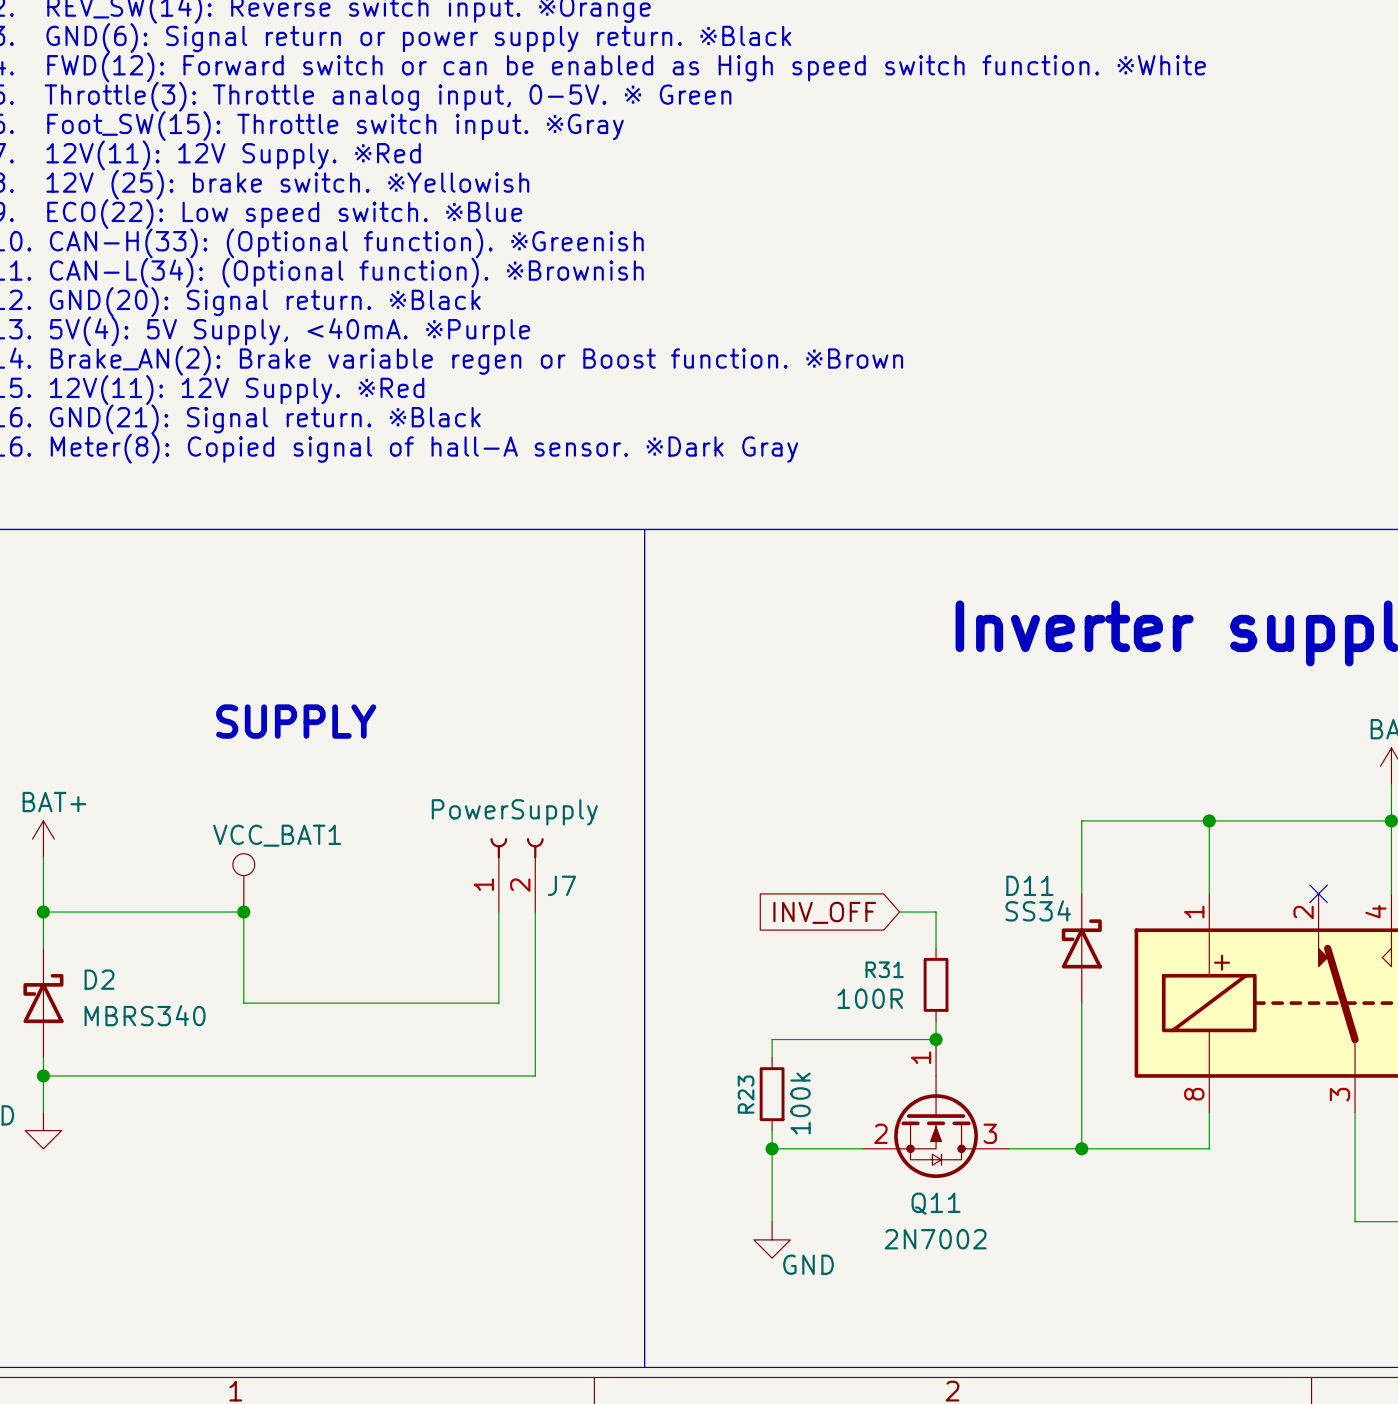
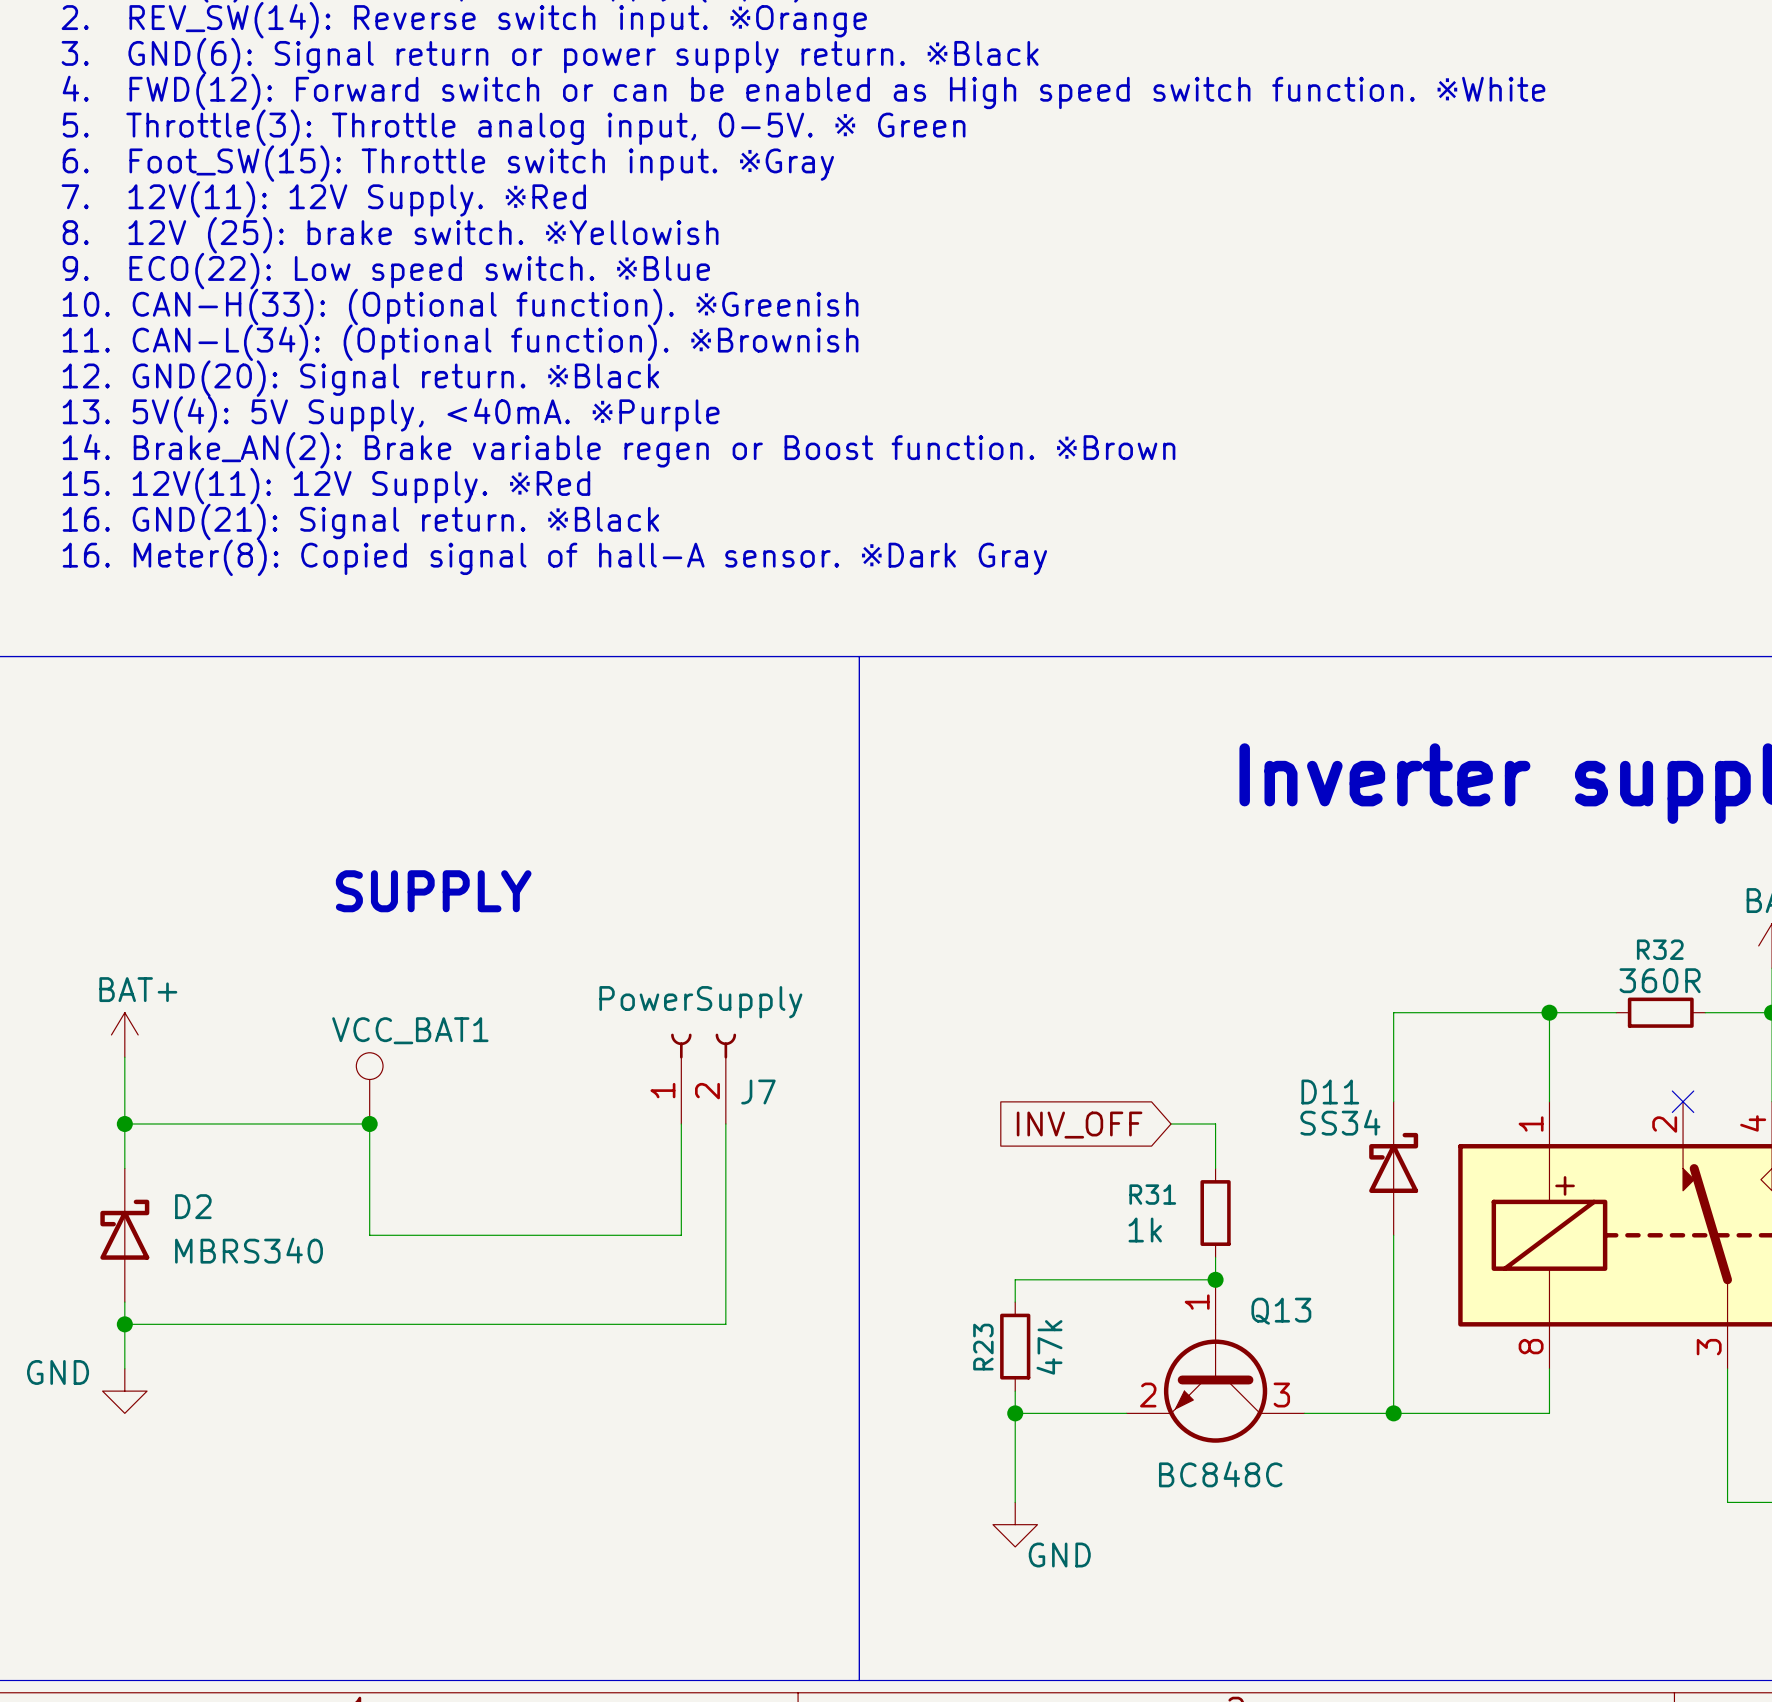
wire: (1263, 820) (1336, 820) -> none
R32: none -> 360R (1660, 1012)
R31 value: 100R (870, 998) -> 1k (1145, 1230)
R23 value: 100k (800, 1103) -> 47k (1049, 1347)
Q13: none -> BC848C (1215, 1361)
Q11: 2N7002 (936, 1108) -> none

